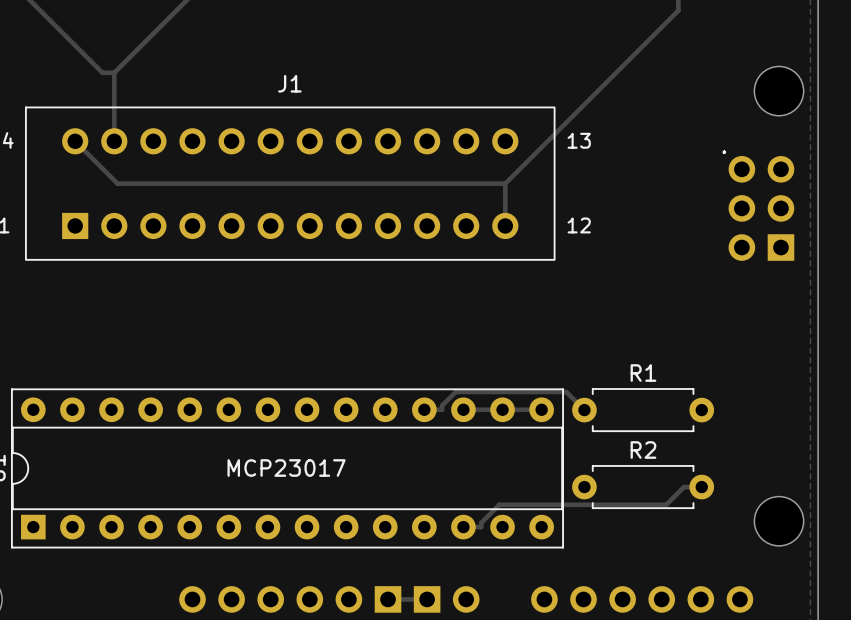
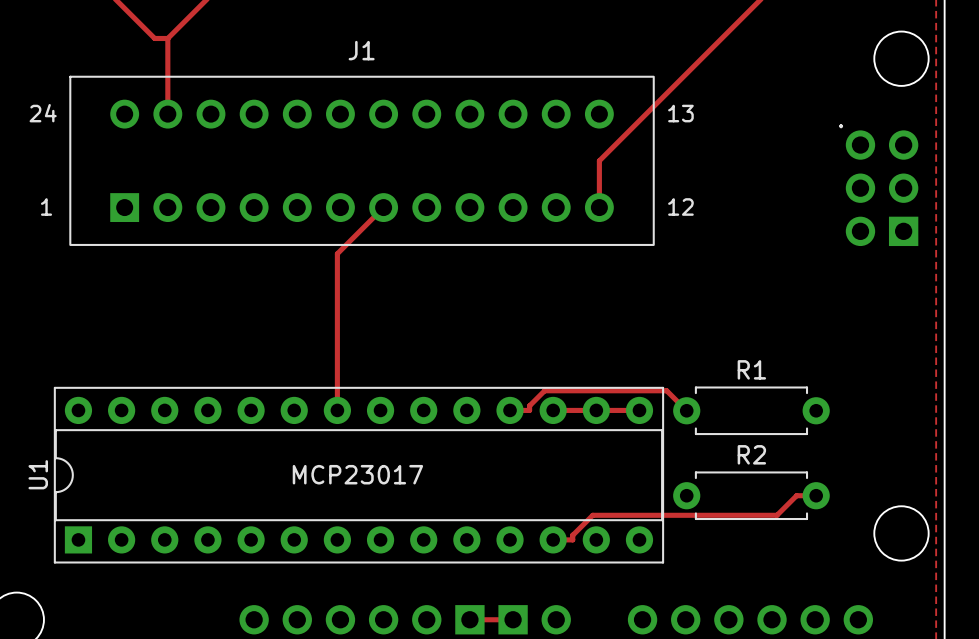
track: (75, 141) (117, 183) (505, 183) -> none
track: none -> (383, 207) (337, 253) (337, 410)

